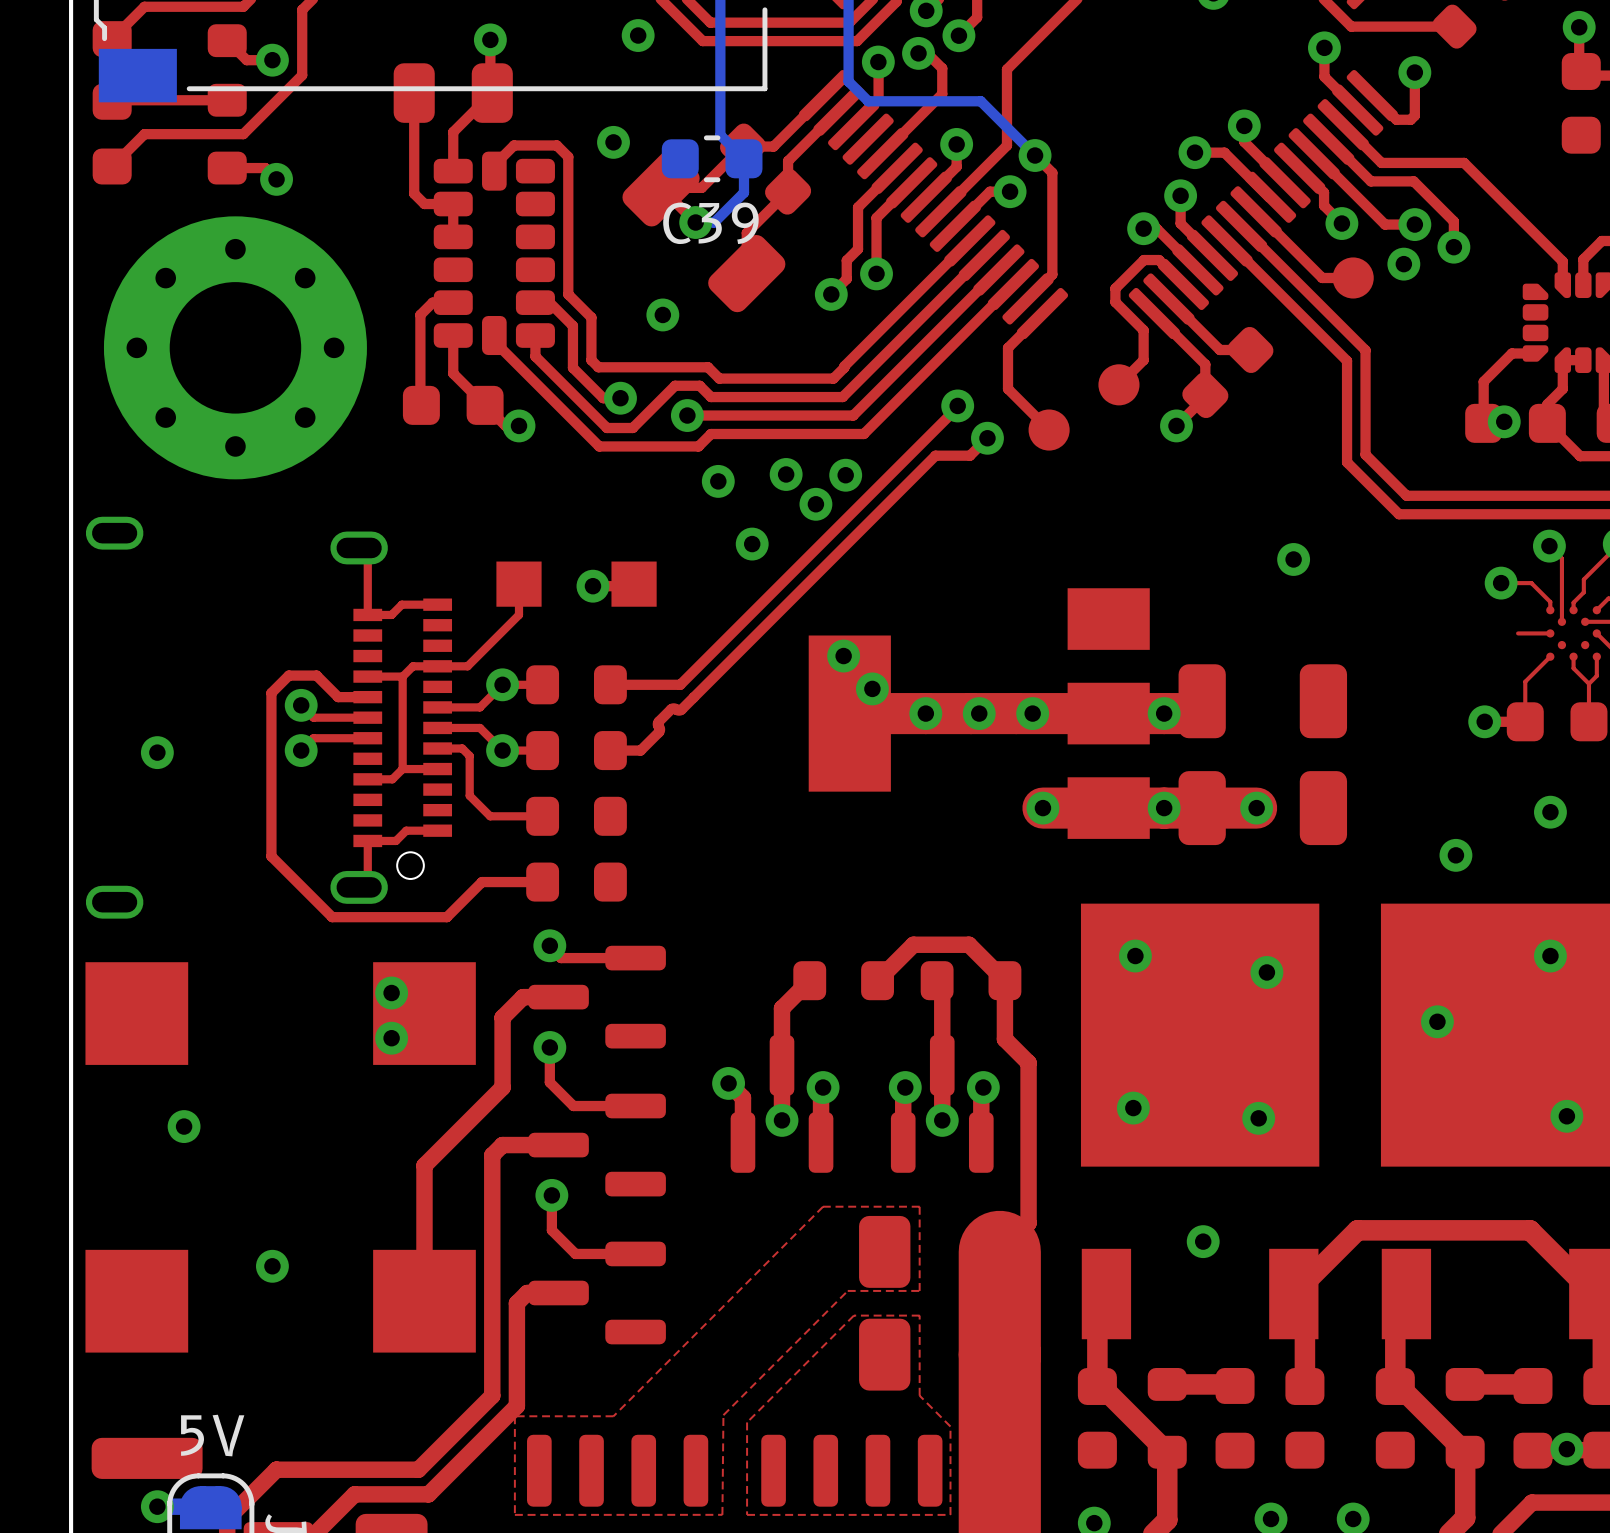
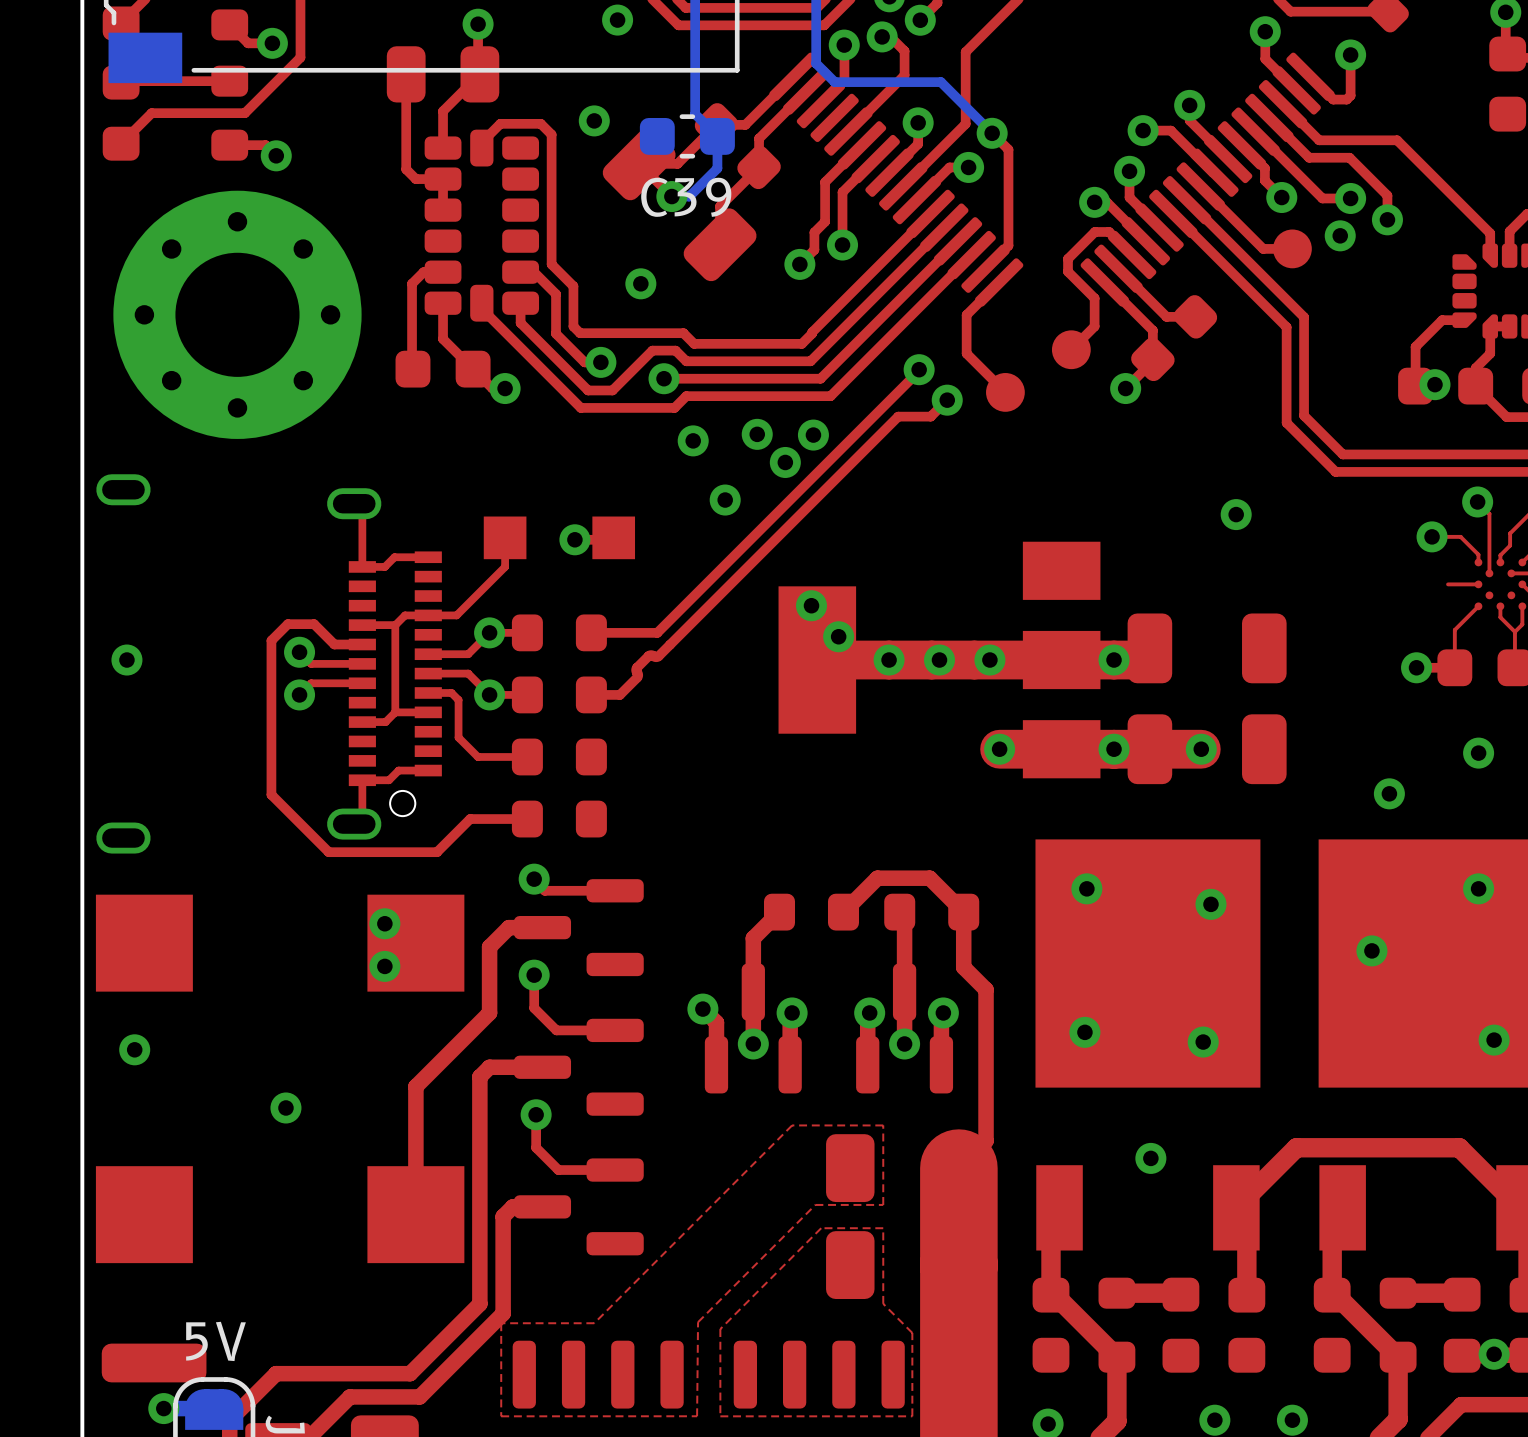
via position: (157, 752) -> (126, 660)
via position: (184, 1126) -> (134, 1049)
via: none -> (285, 1107)
via: (272, 1266) -> none

